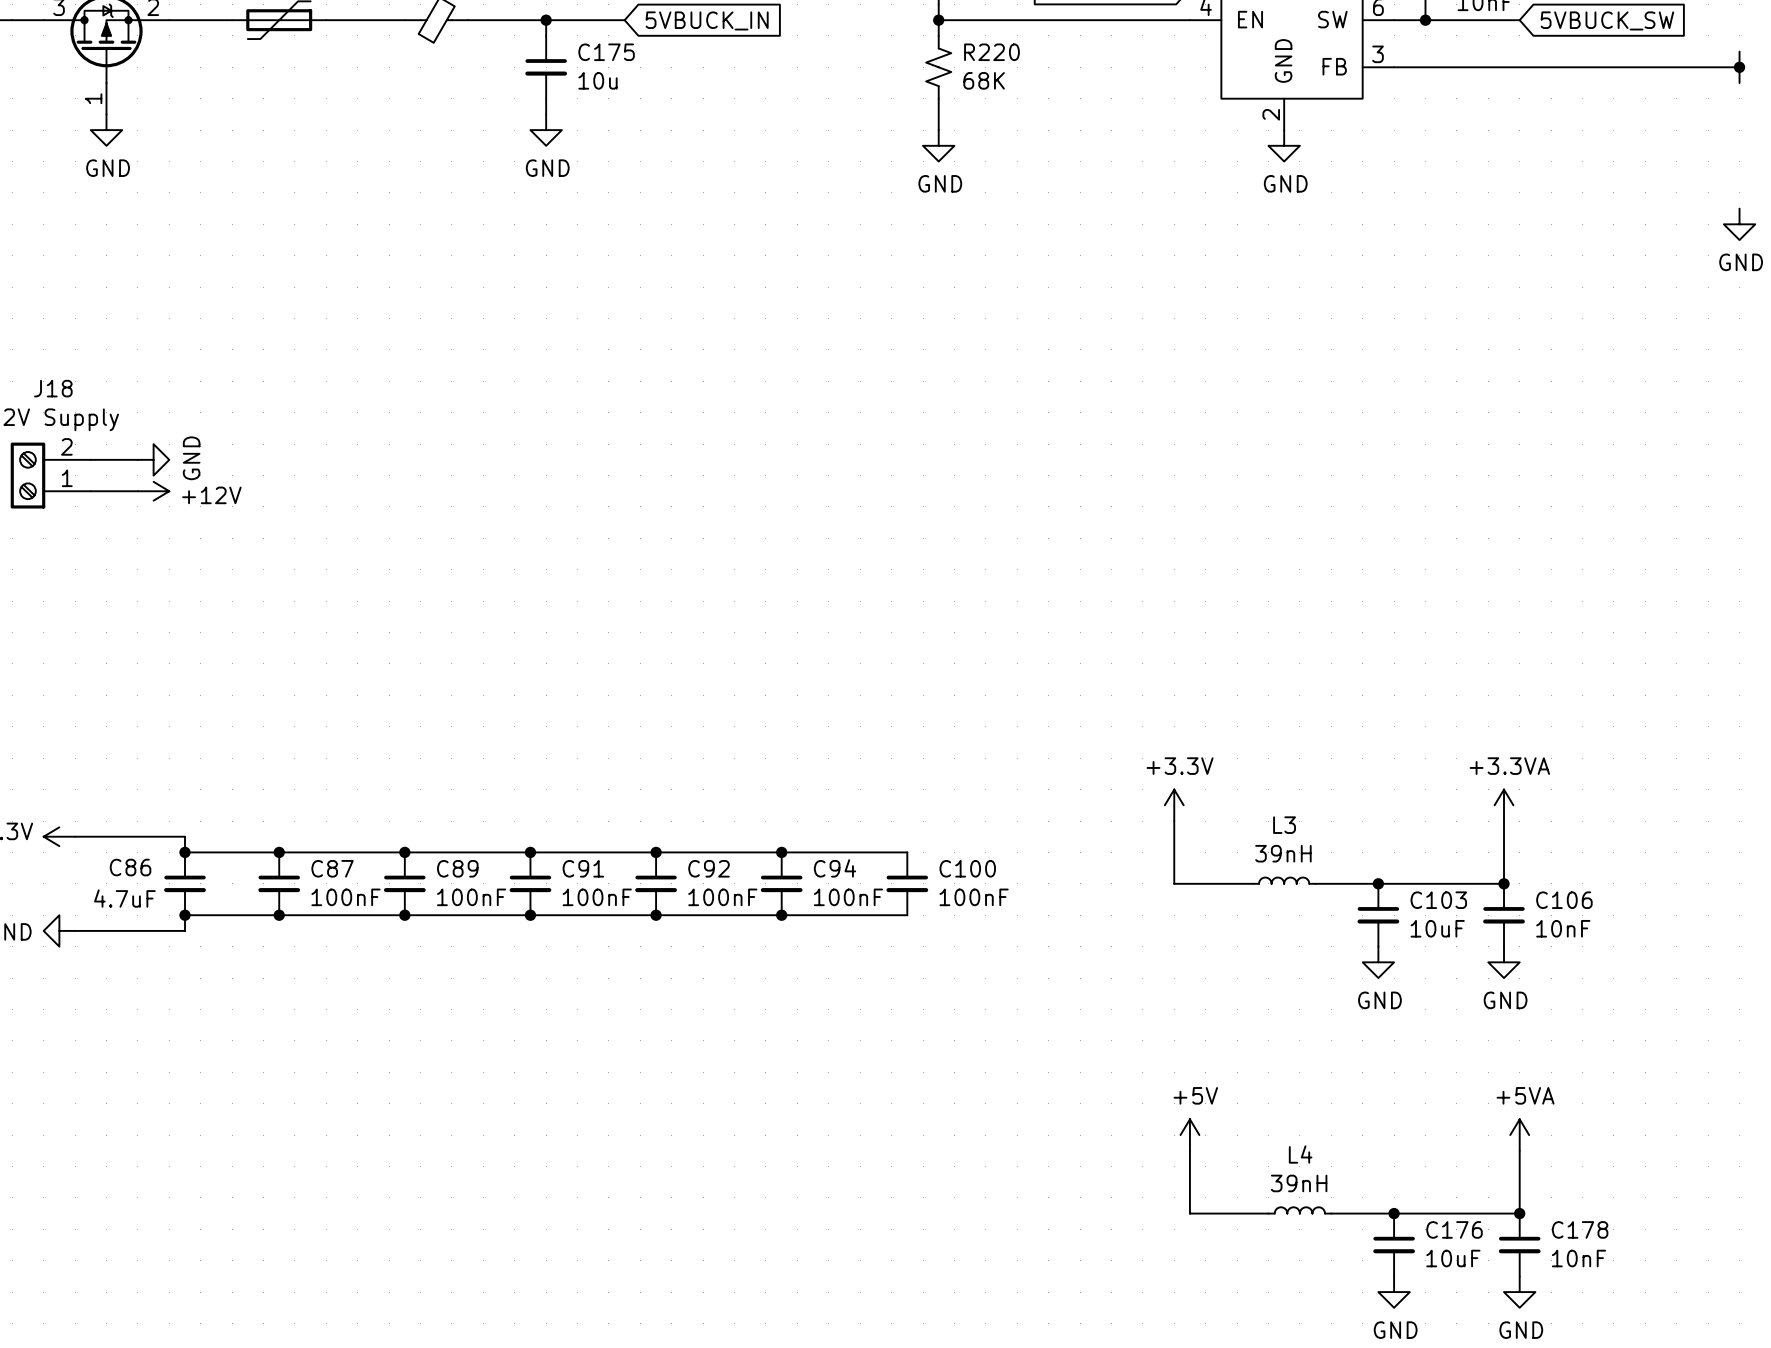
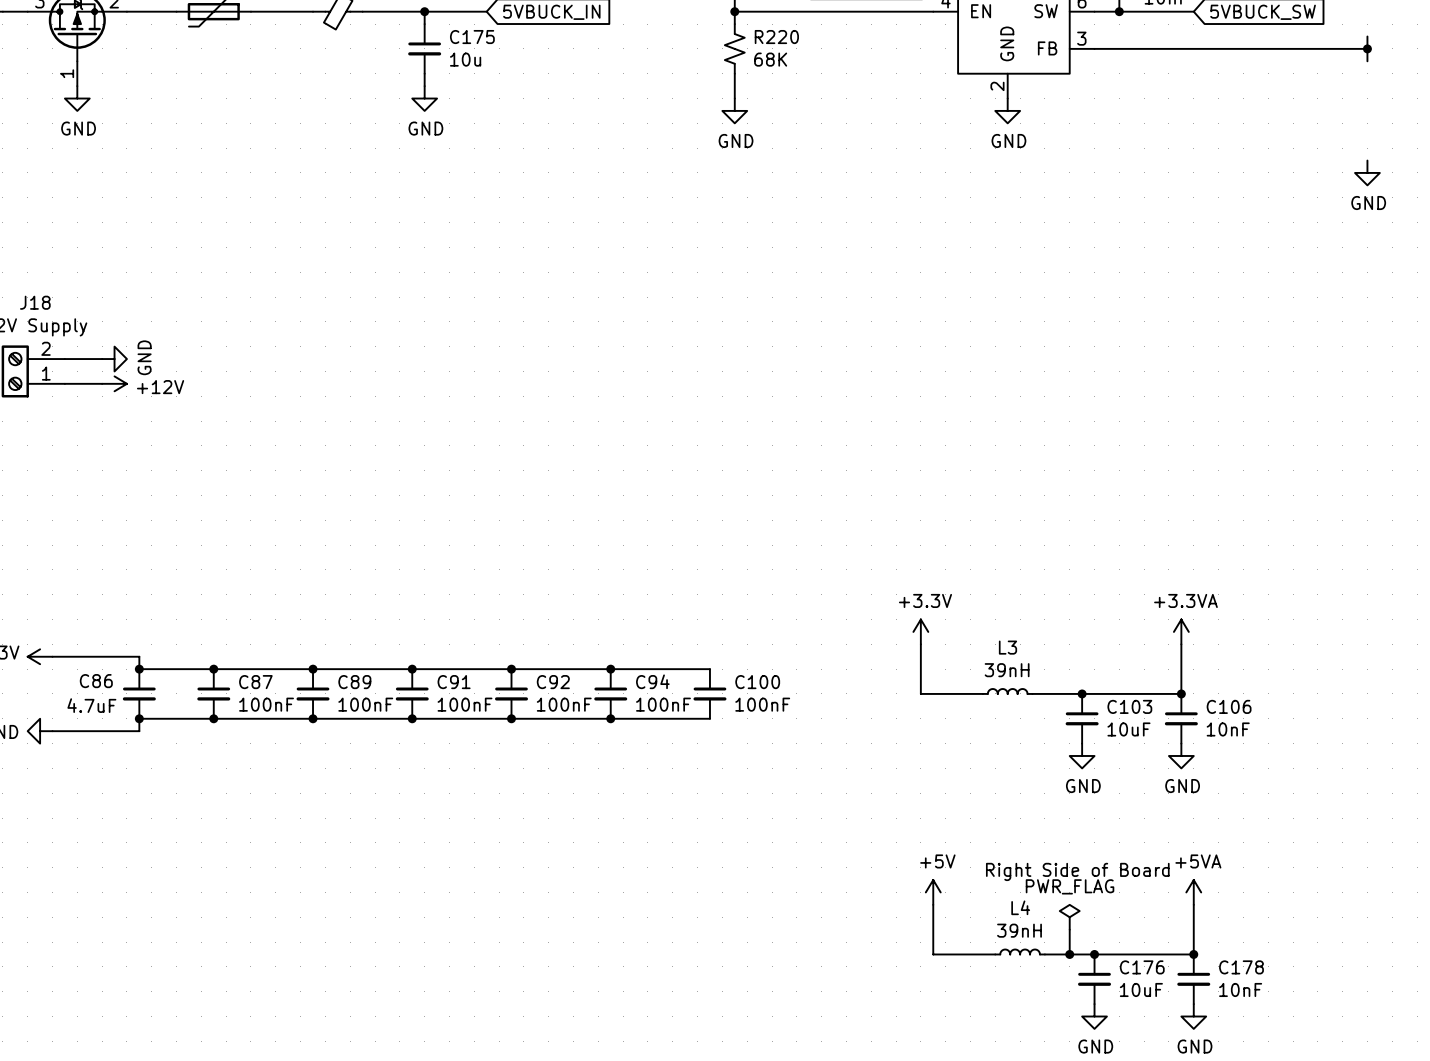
text: none -> Right Side of Board (1077, 871)
power symbol: none -> PWR_FLAG (1069, 917)
wire: none -> (1069, 929) (1069, 954)
junction: none -> (1069, 954)

